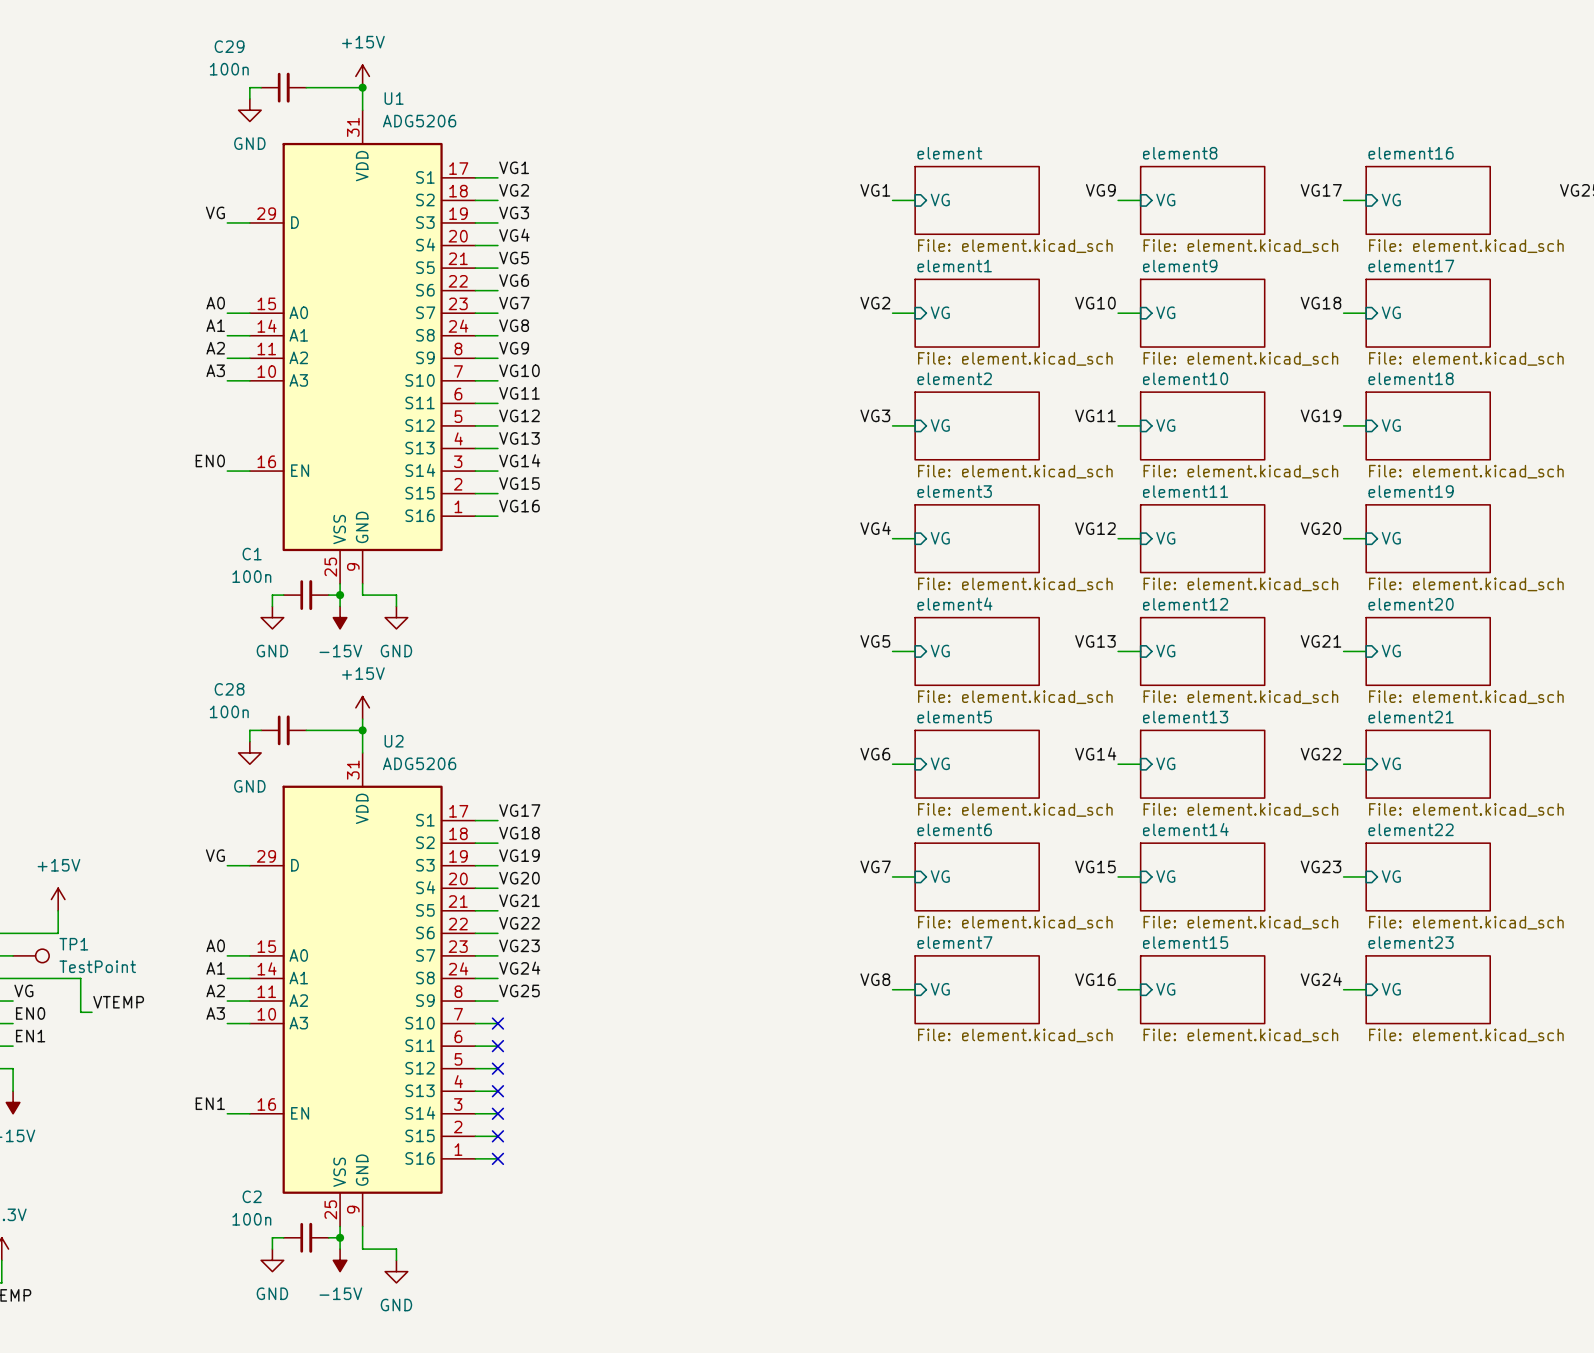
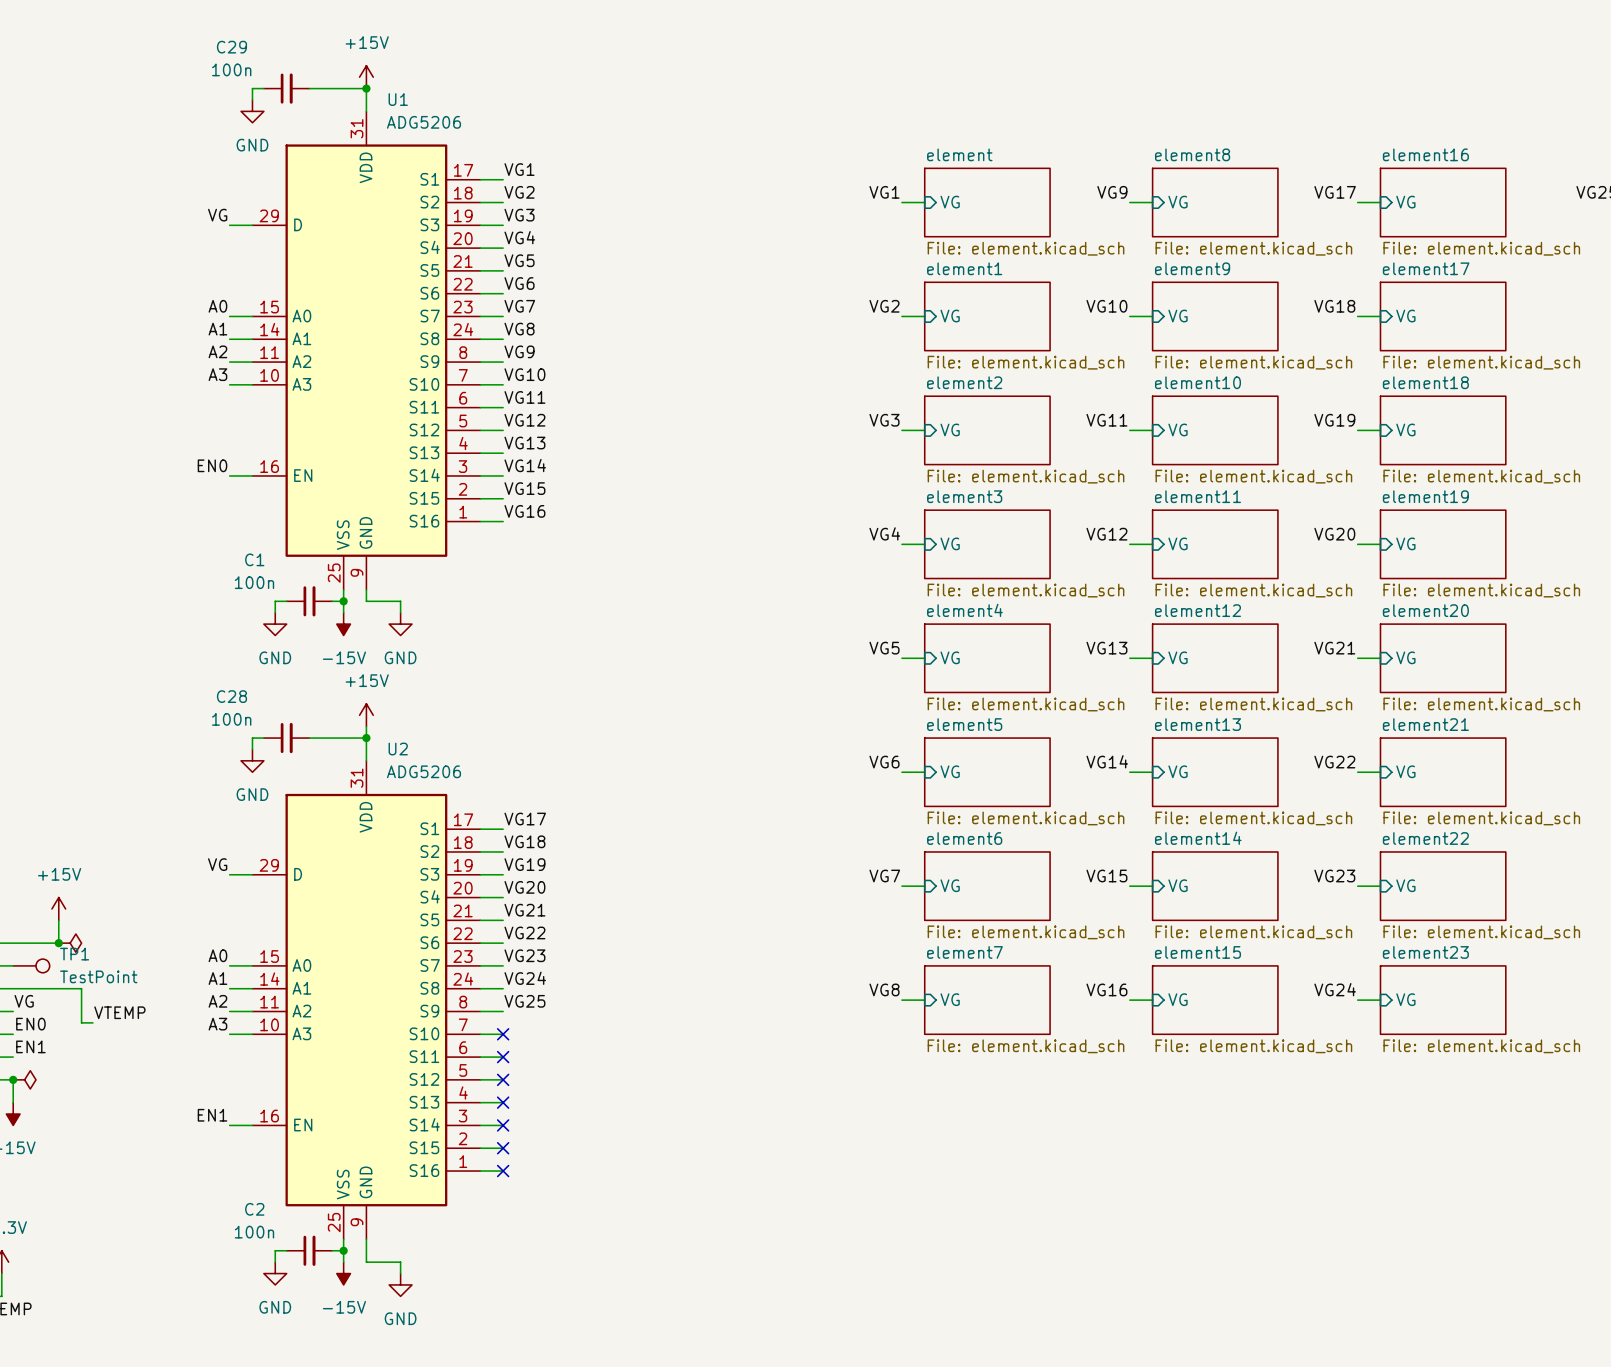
junction: none -> (58, 943)
power symbol: none -> (70, 943)
junction: none -> (13, 1079)
power symbol: none -> (24, 1079)

